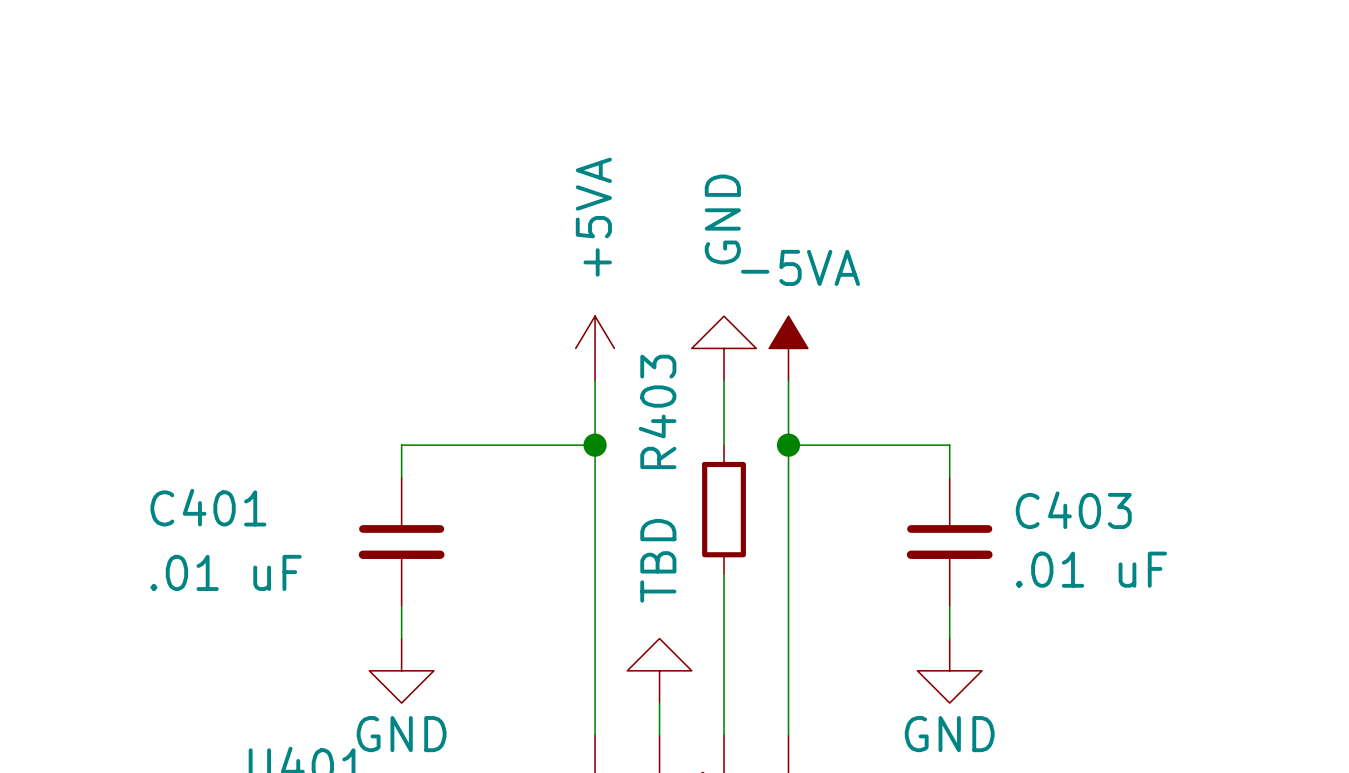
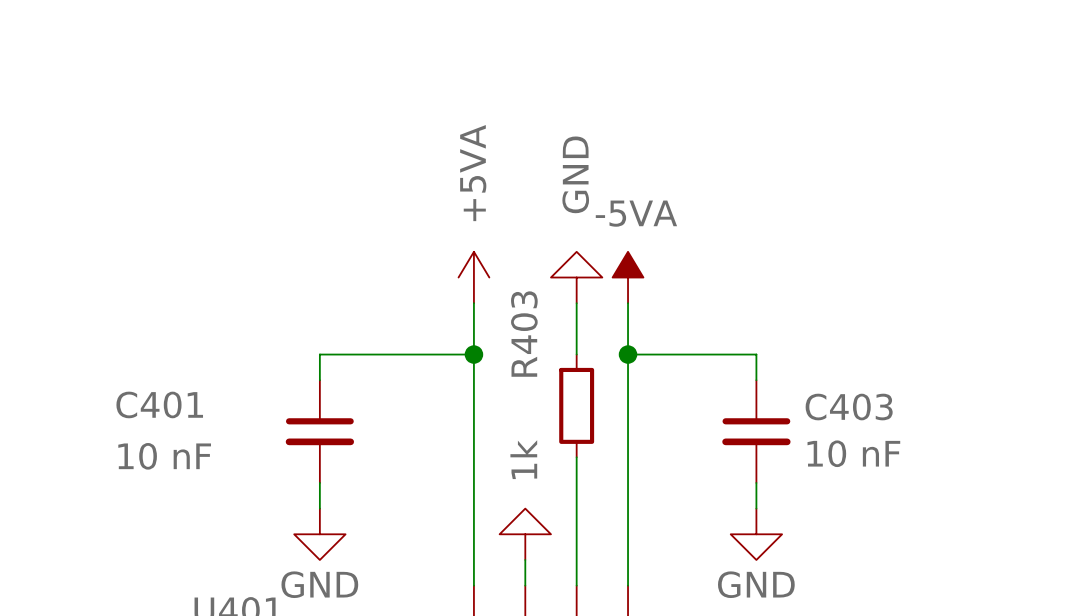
R403 value: TBD (658, 560) -> 1k (523, 459)
C403 value: .01 uF (1091, 569) -> 10 nF (853, 453)
C401 value: .01 uF (226, 572) -> 10 nF (164, 456)

